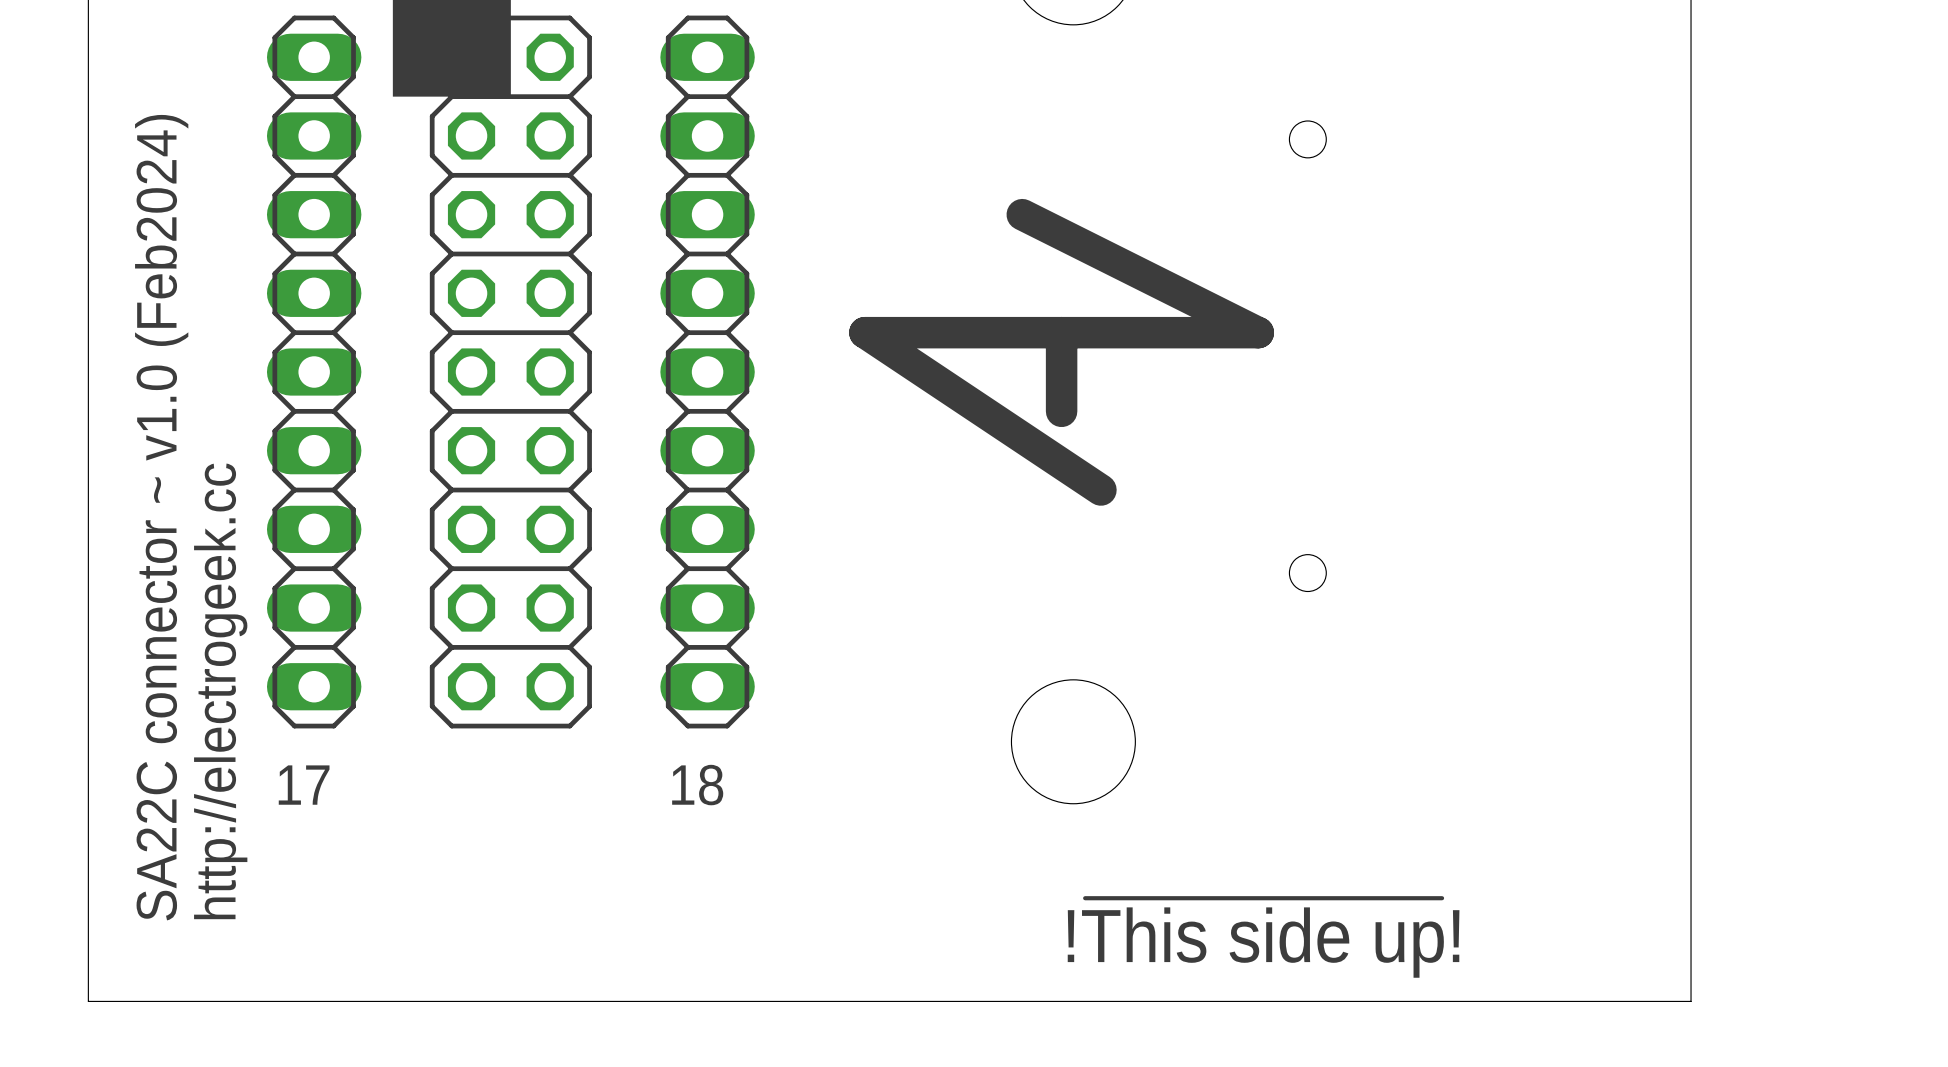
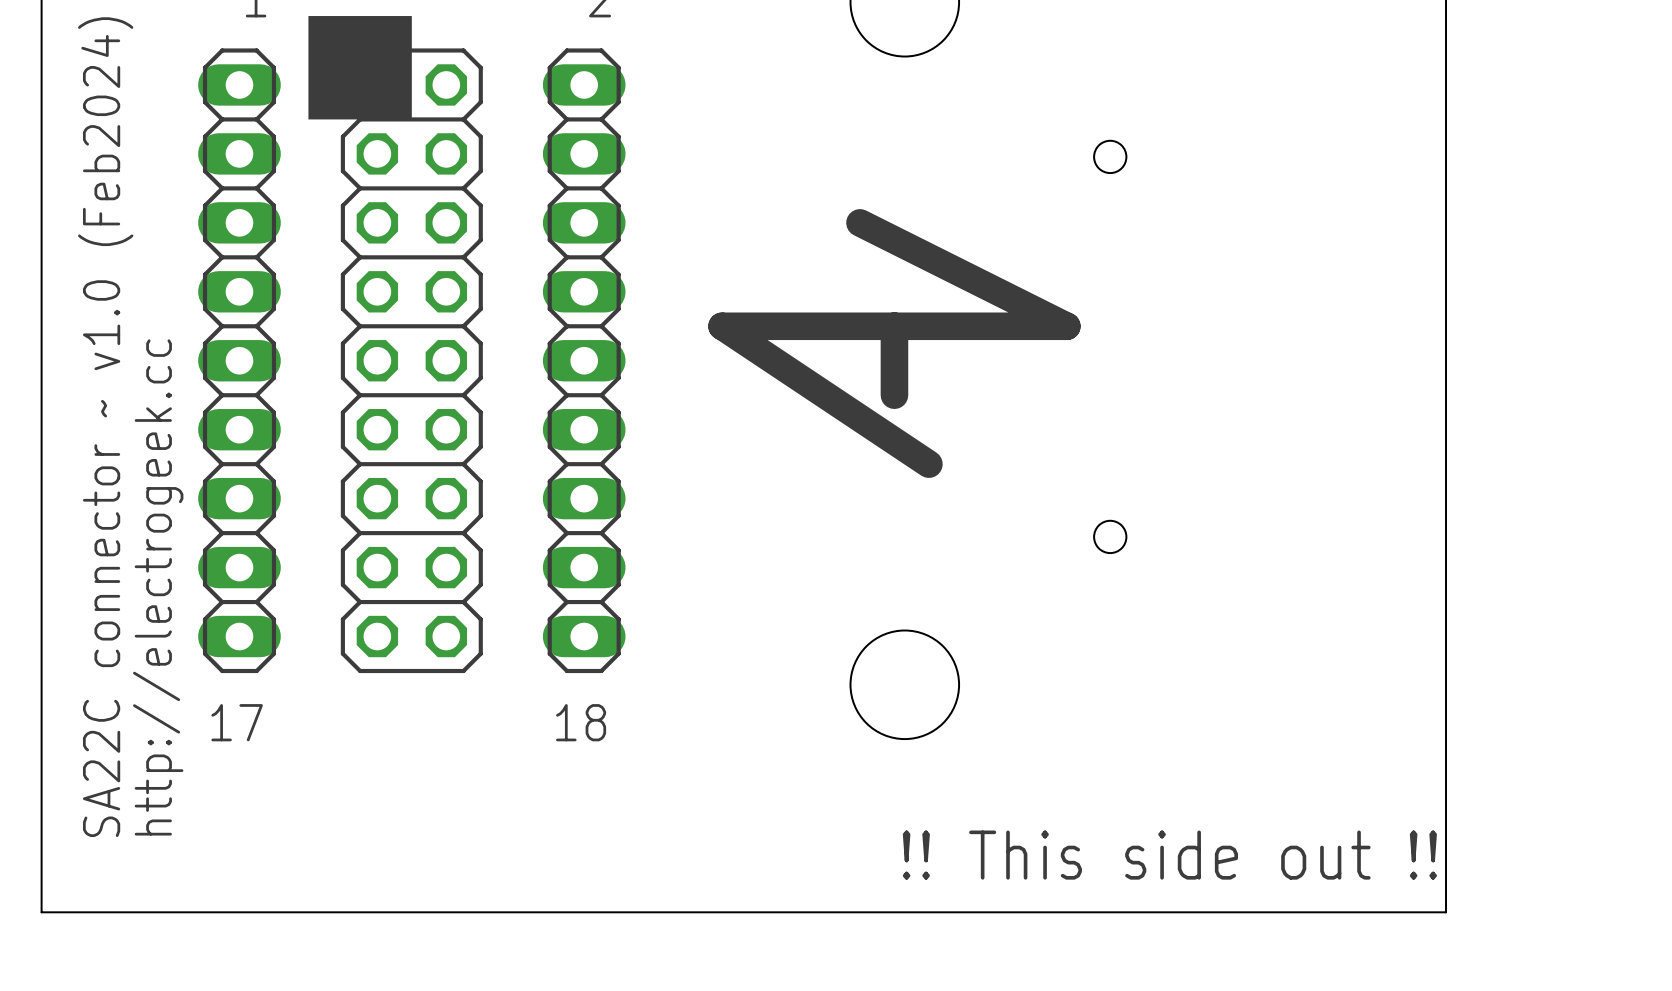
text: !~{This side up}! (1263, 937) -> !! This side out !! (1169, 855)

